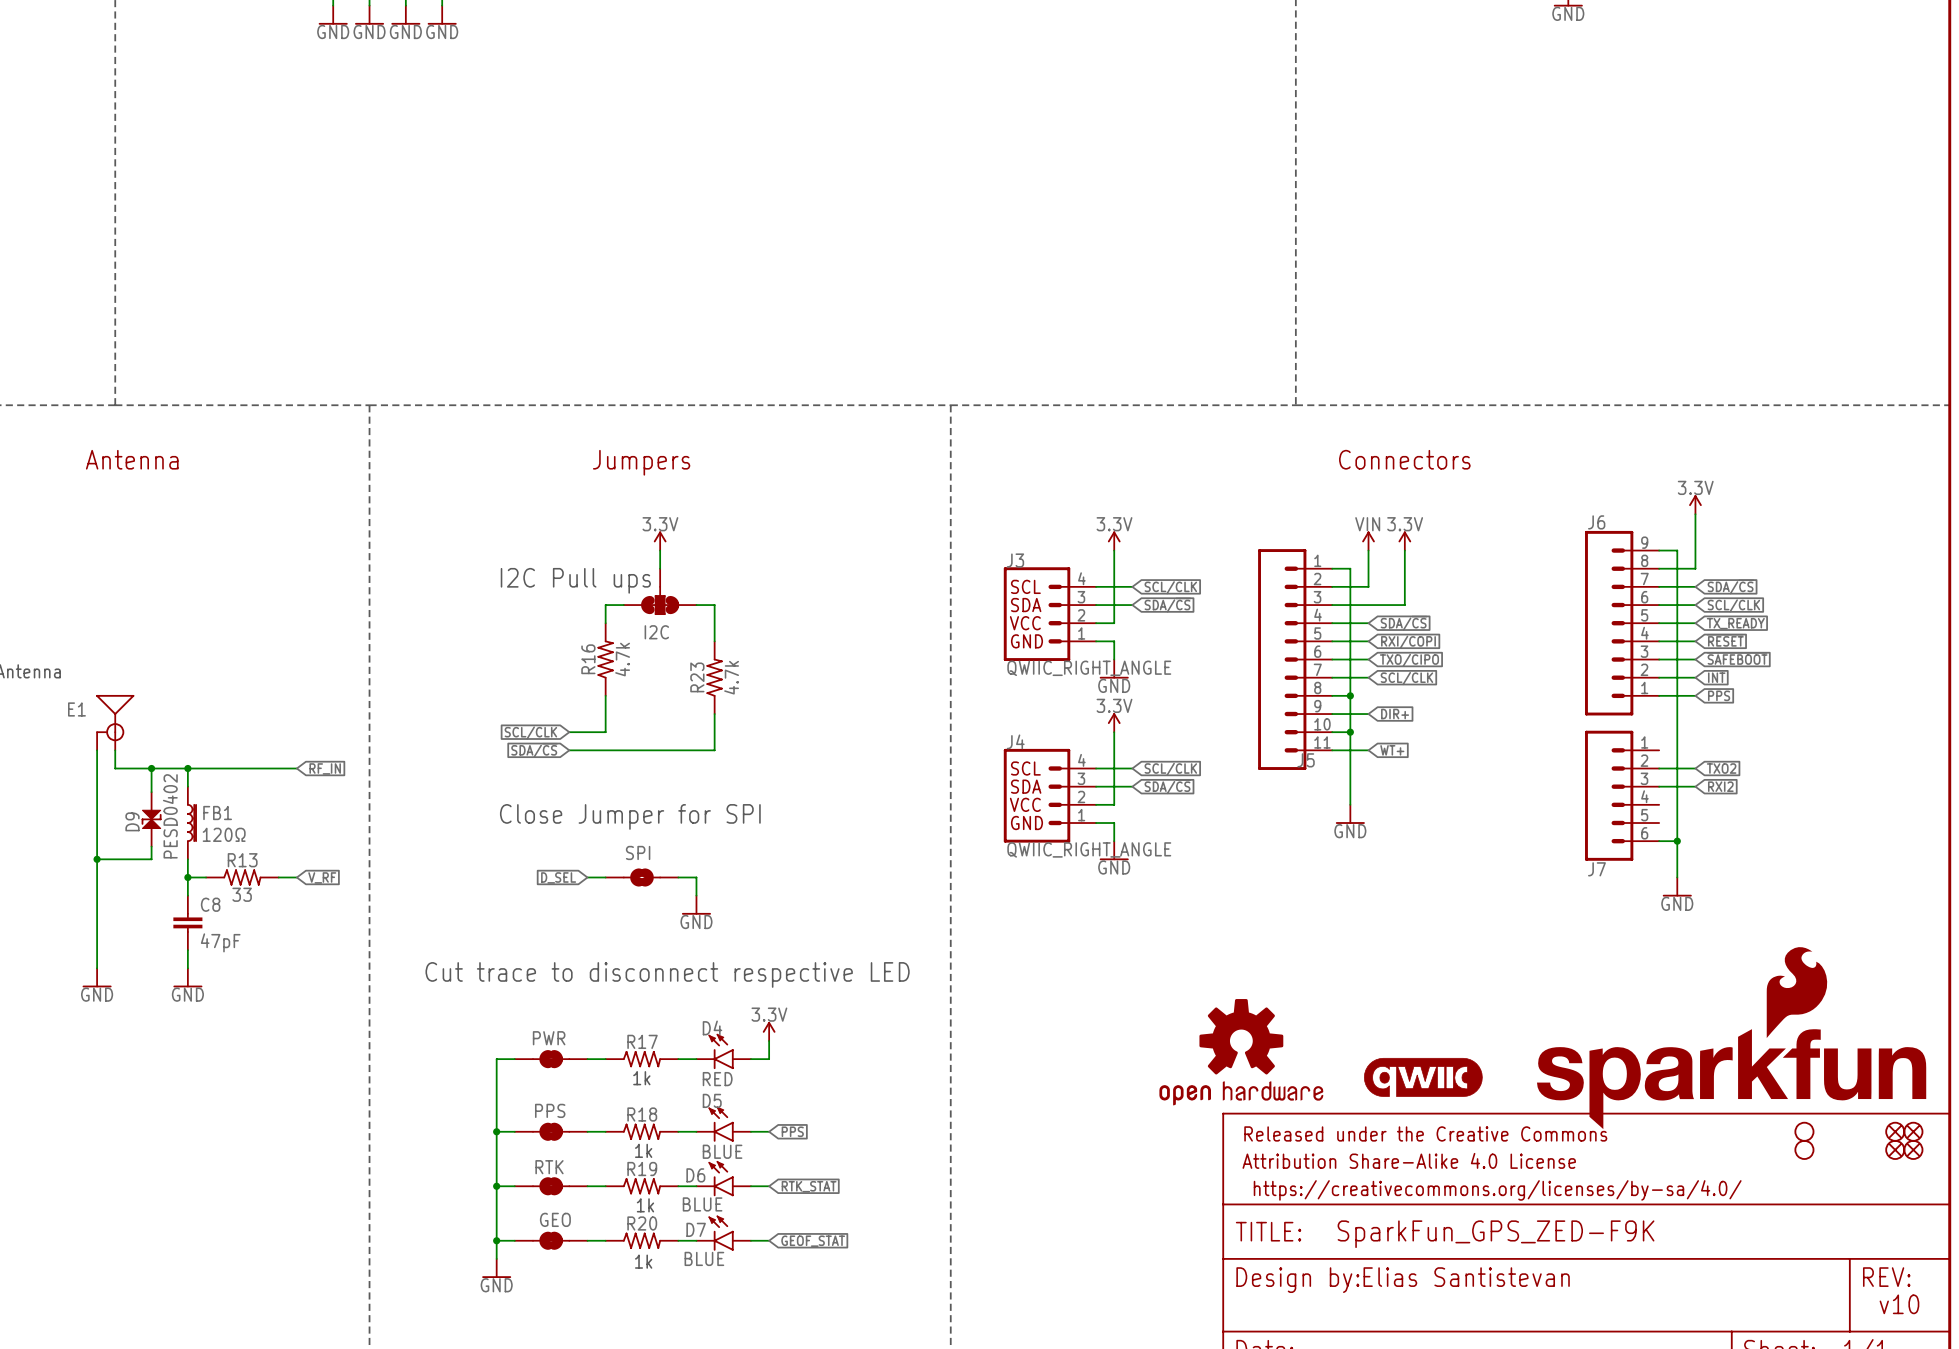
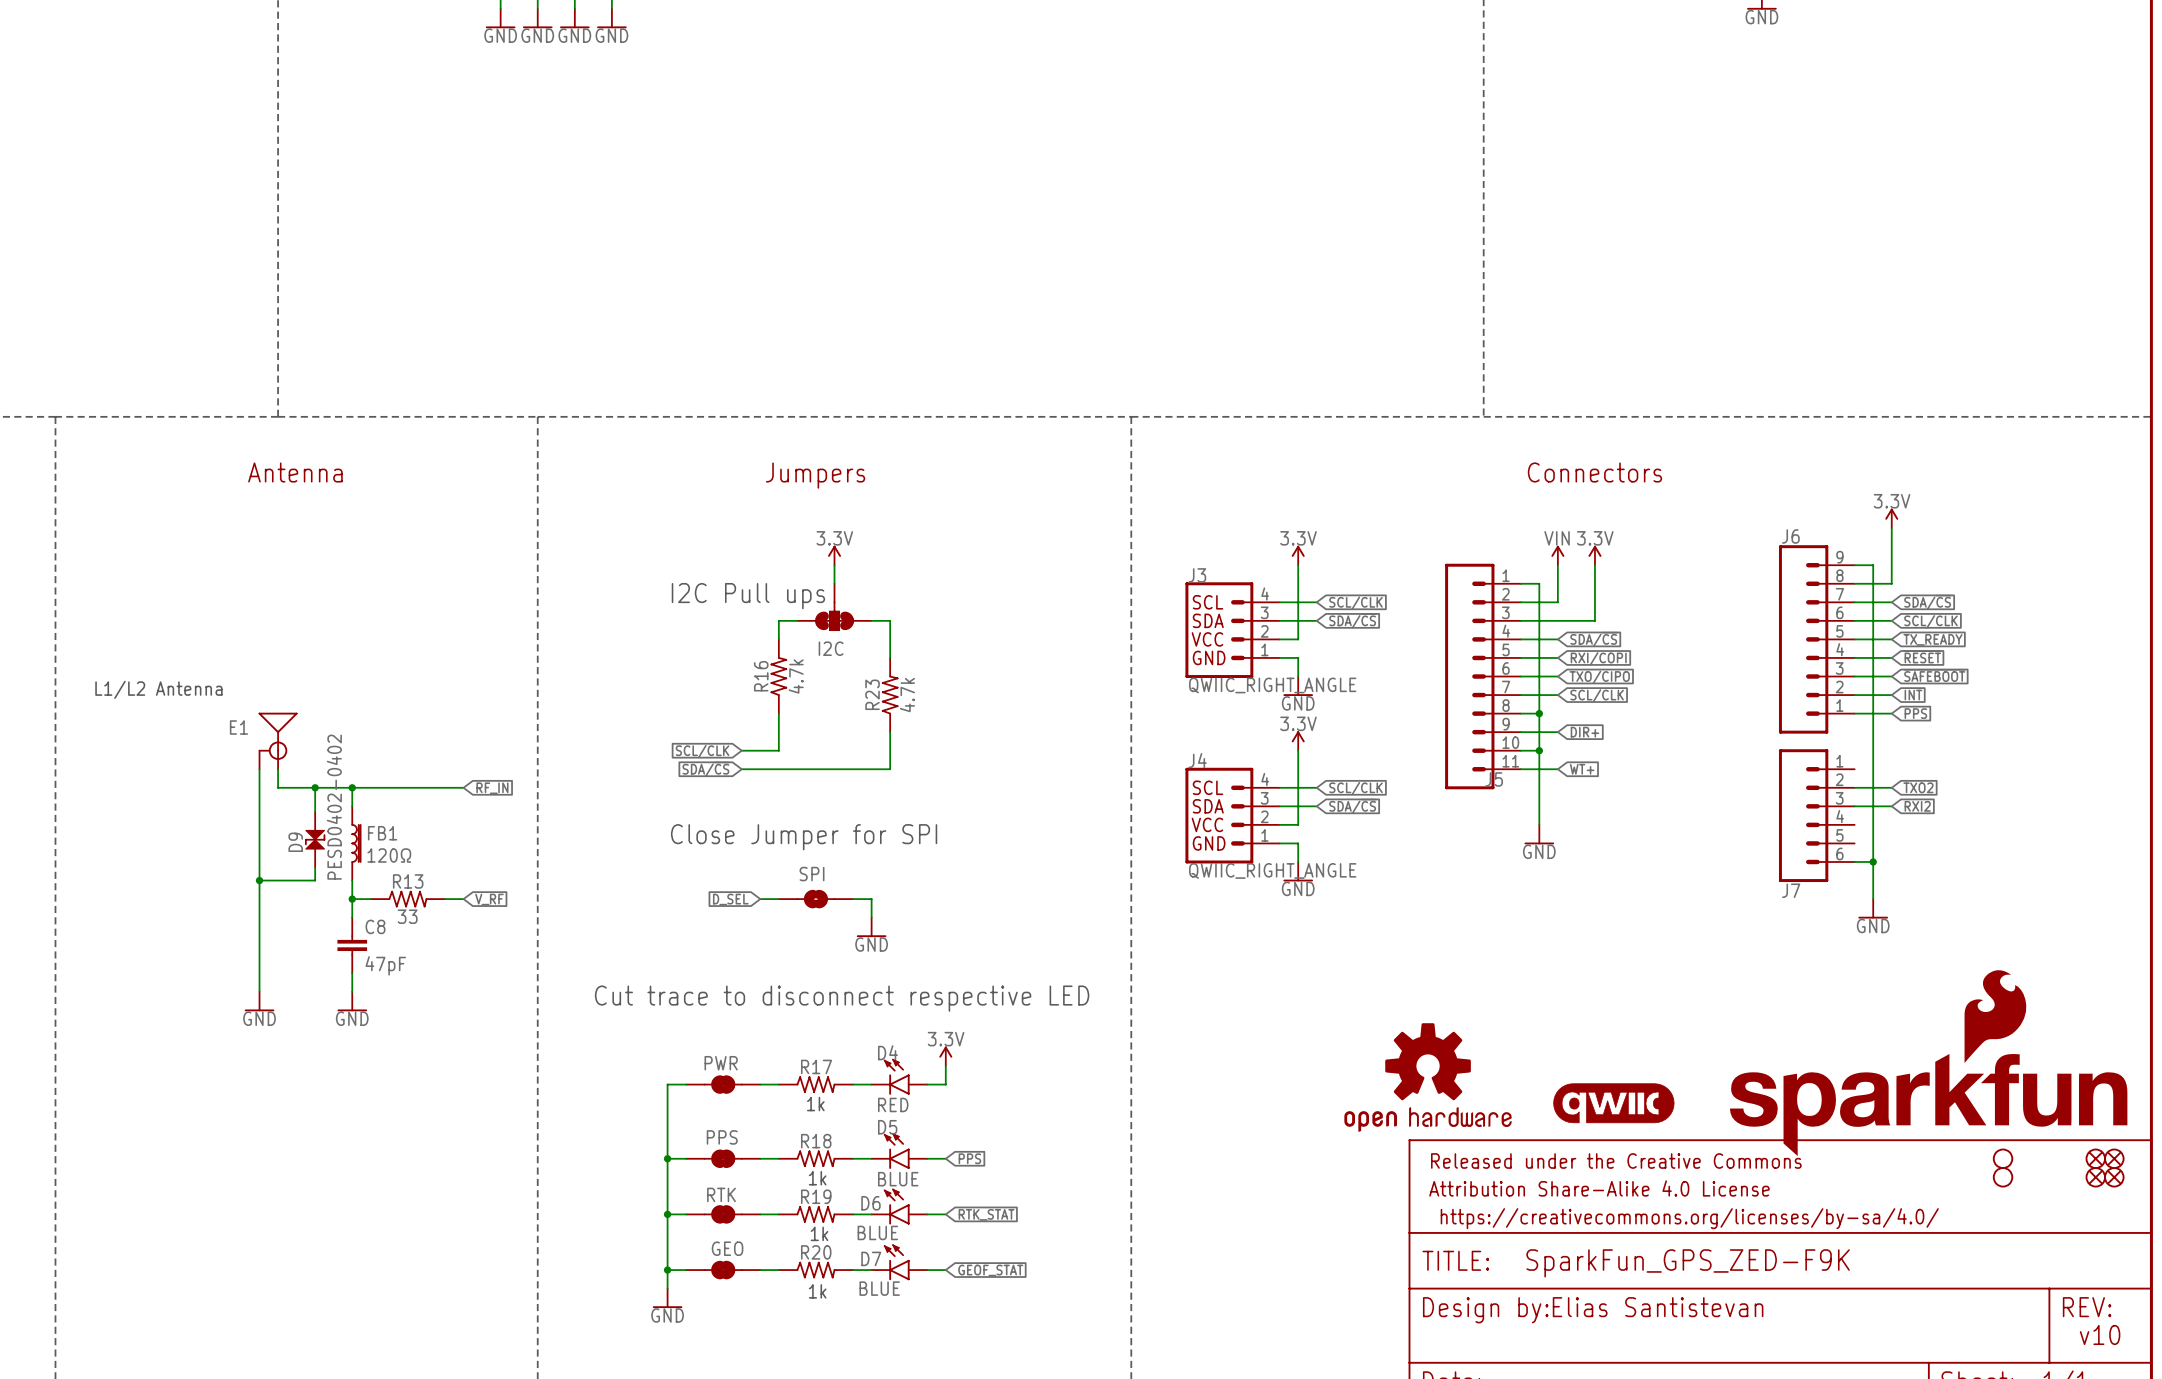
D9 value: PESD0402 (170, 816) -> PESD0402-0402 (334, 807)

